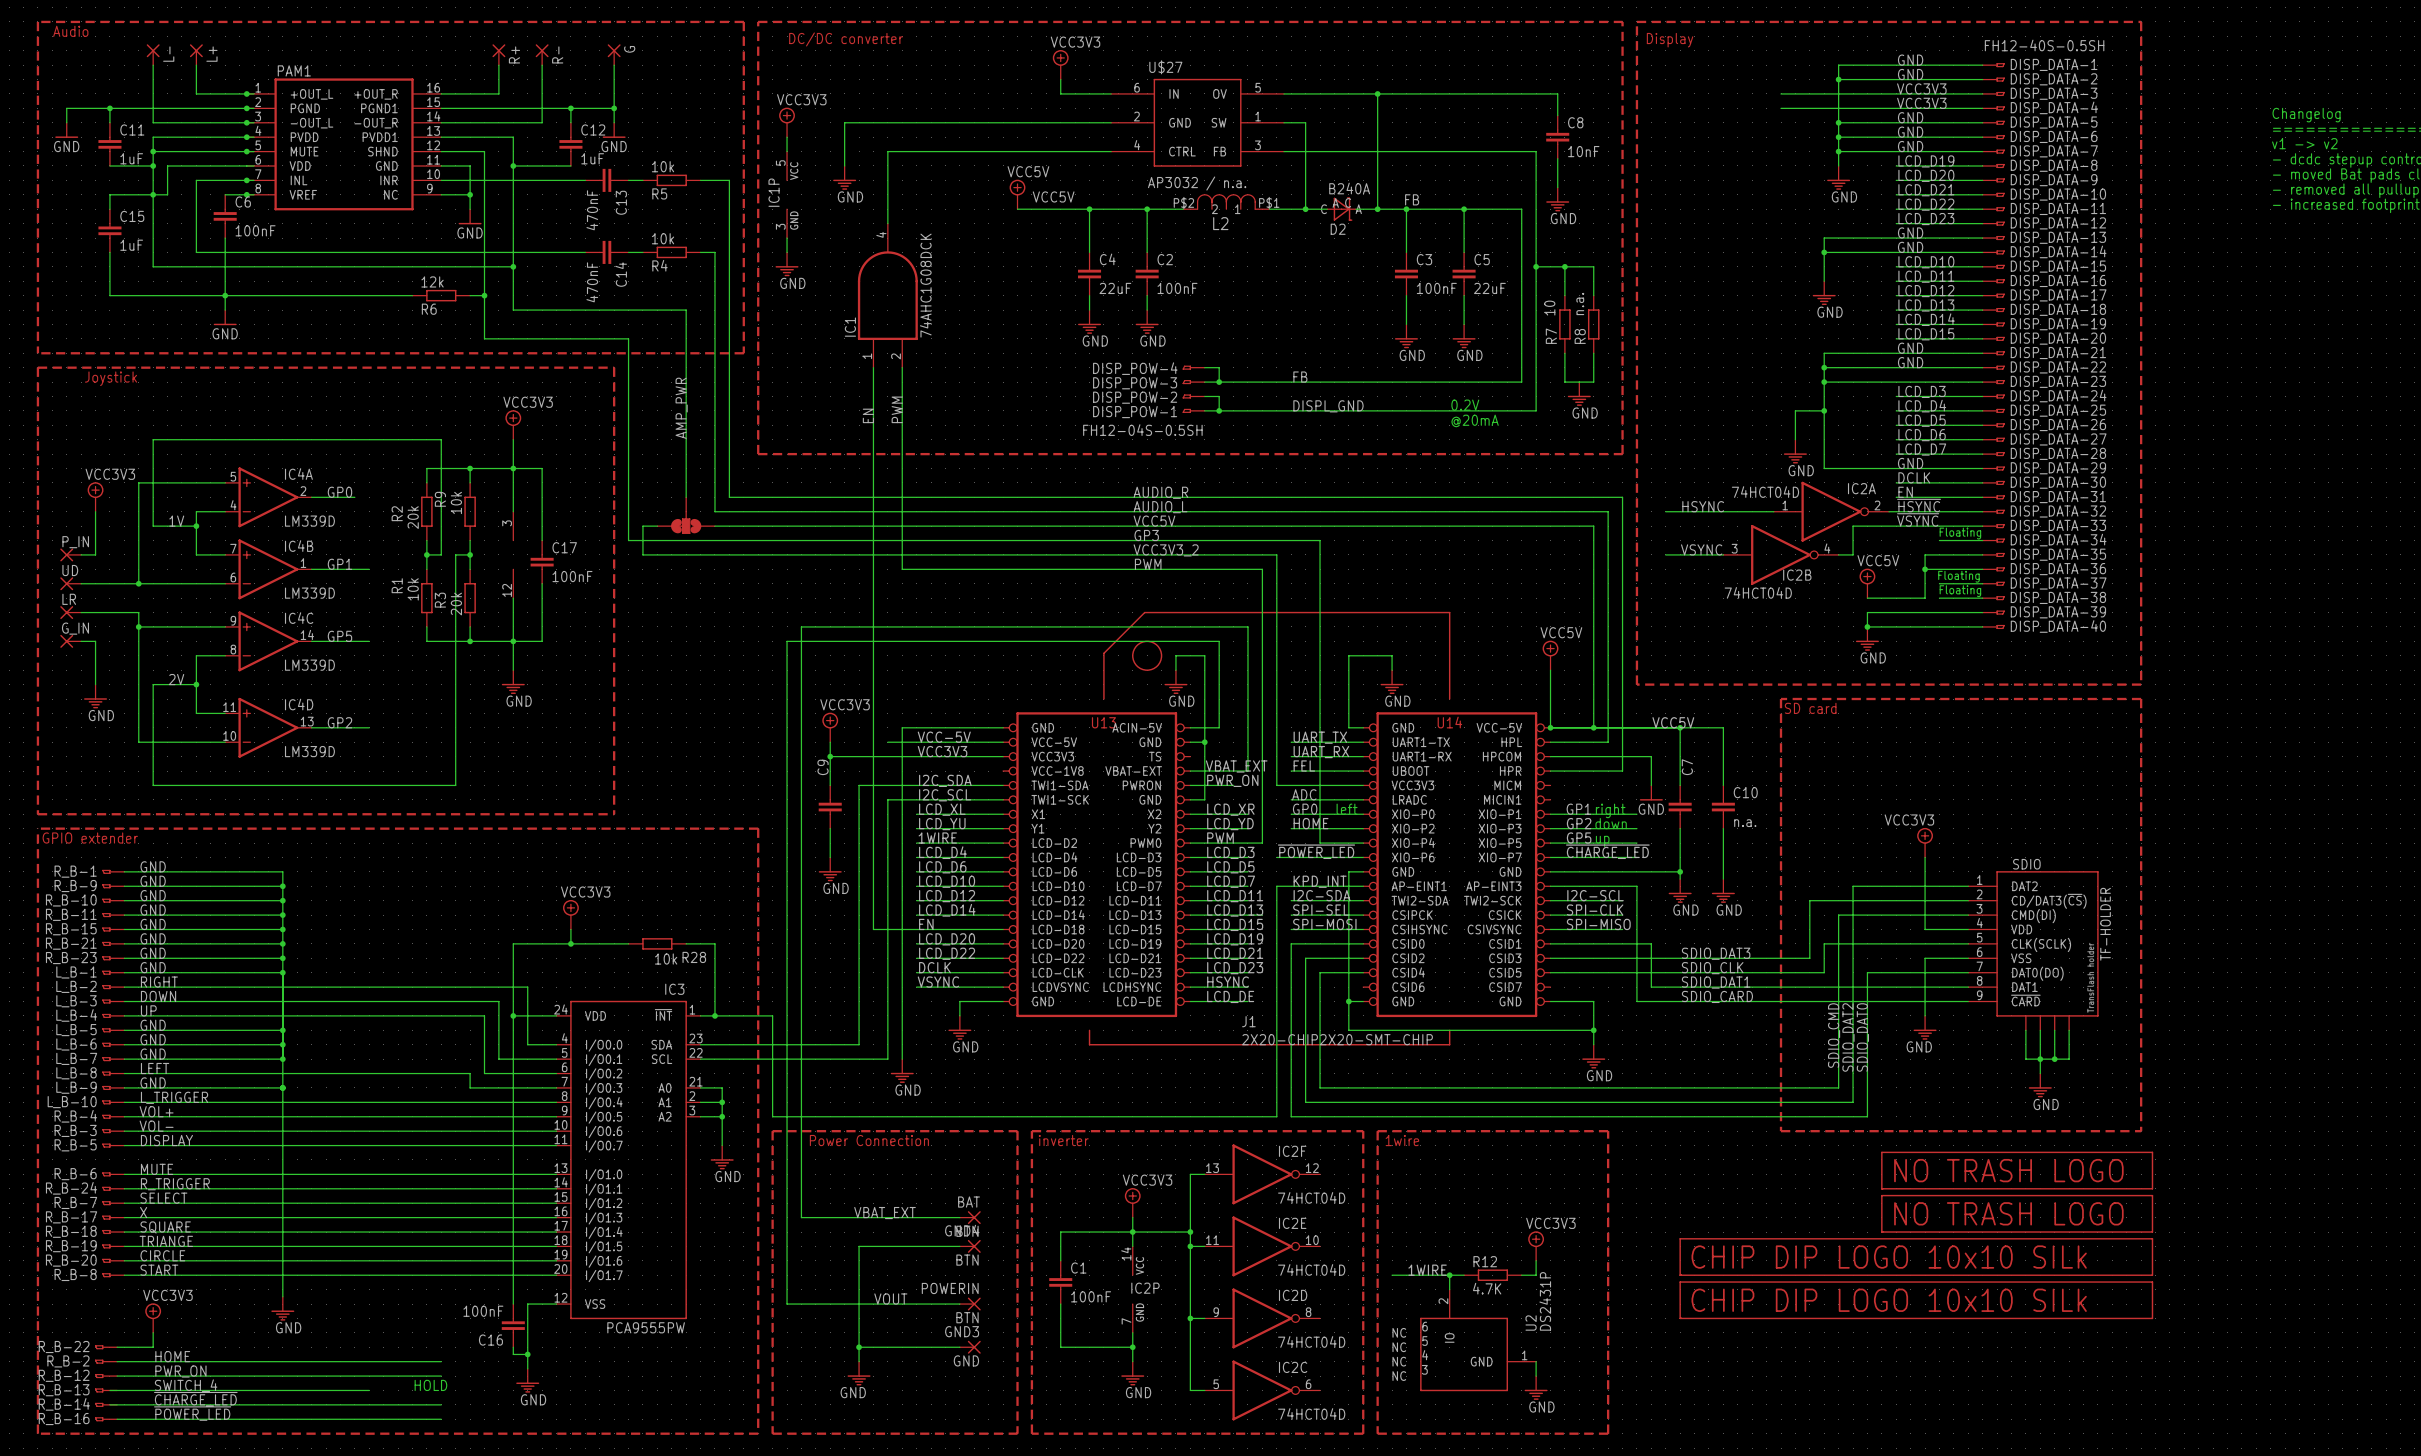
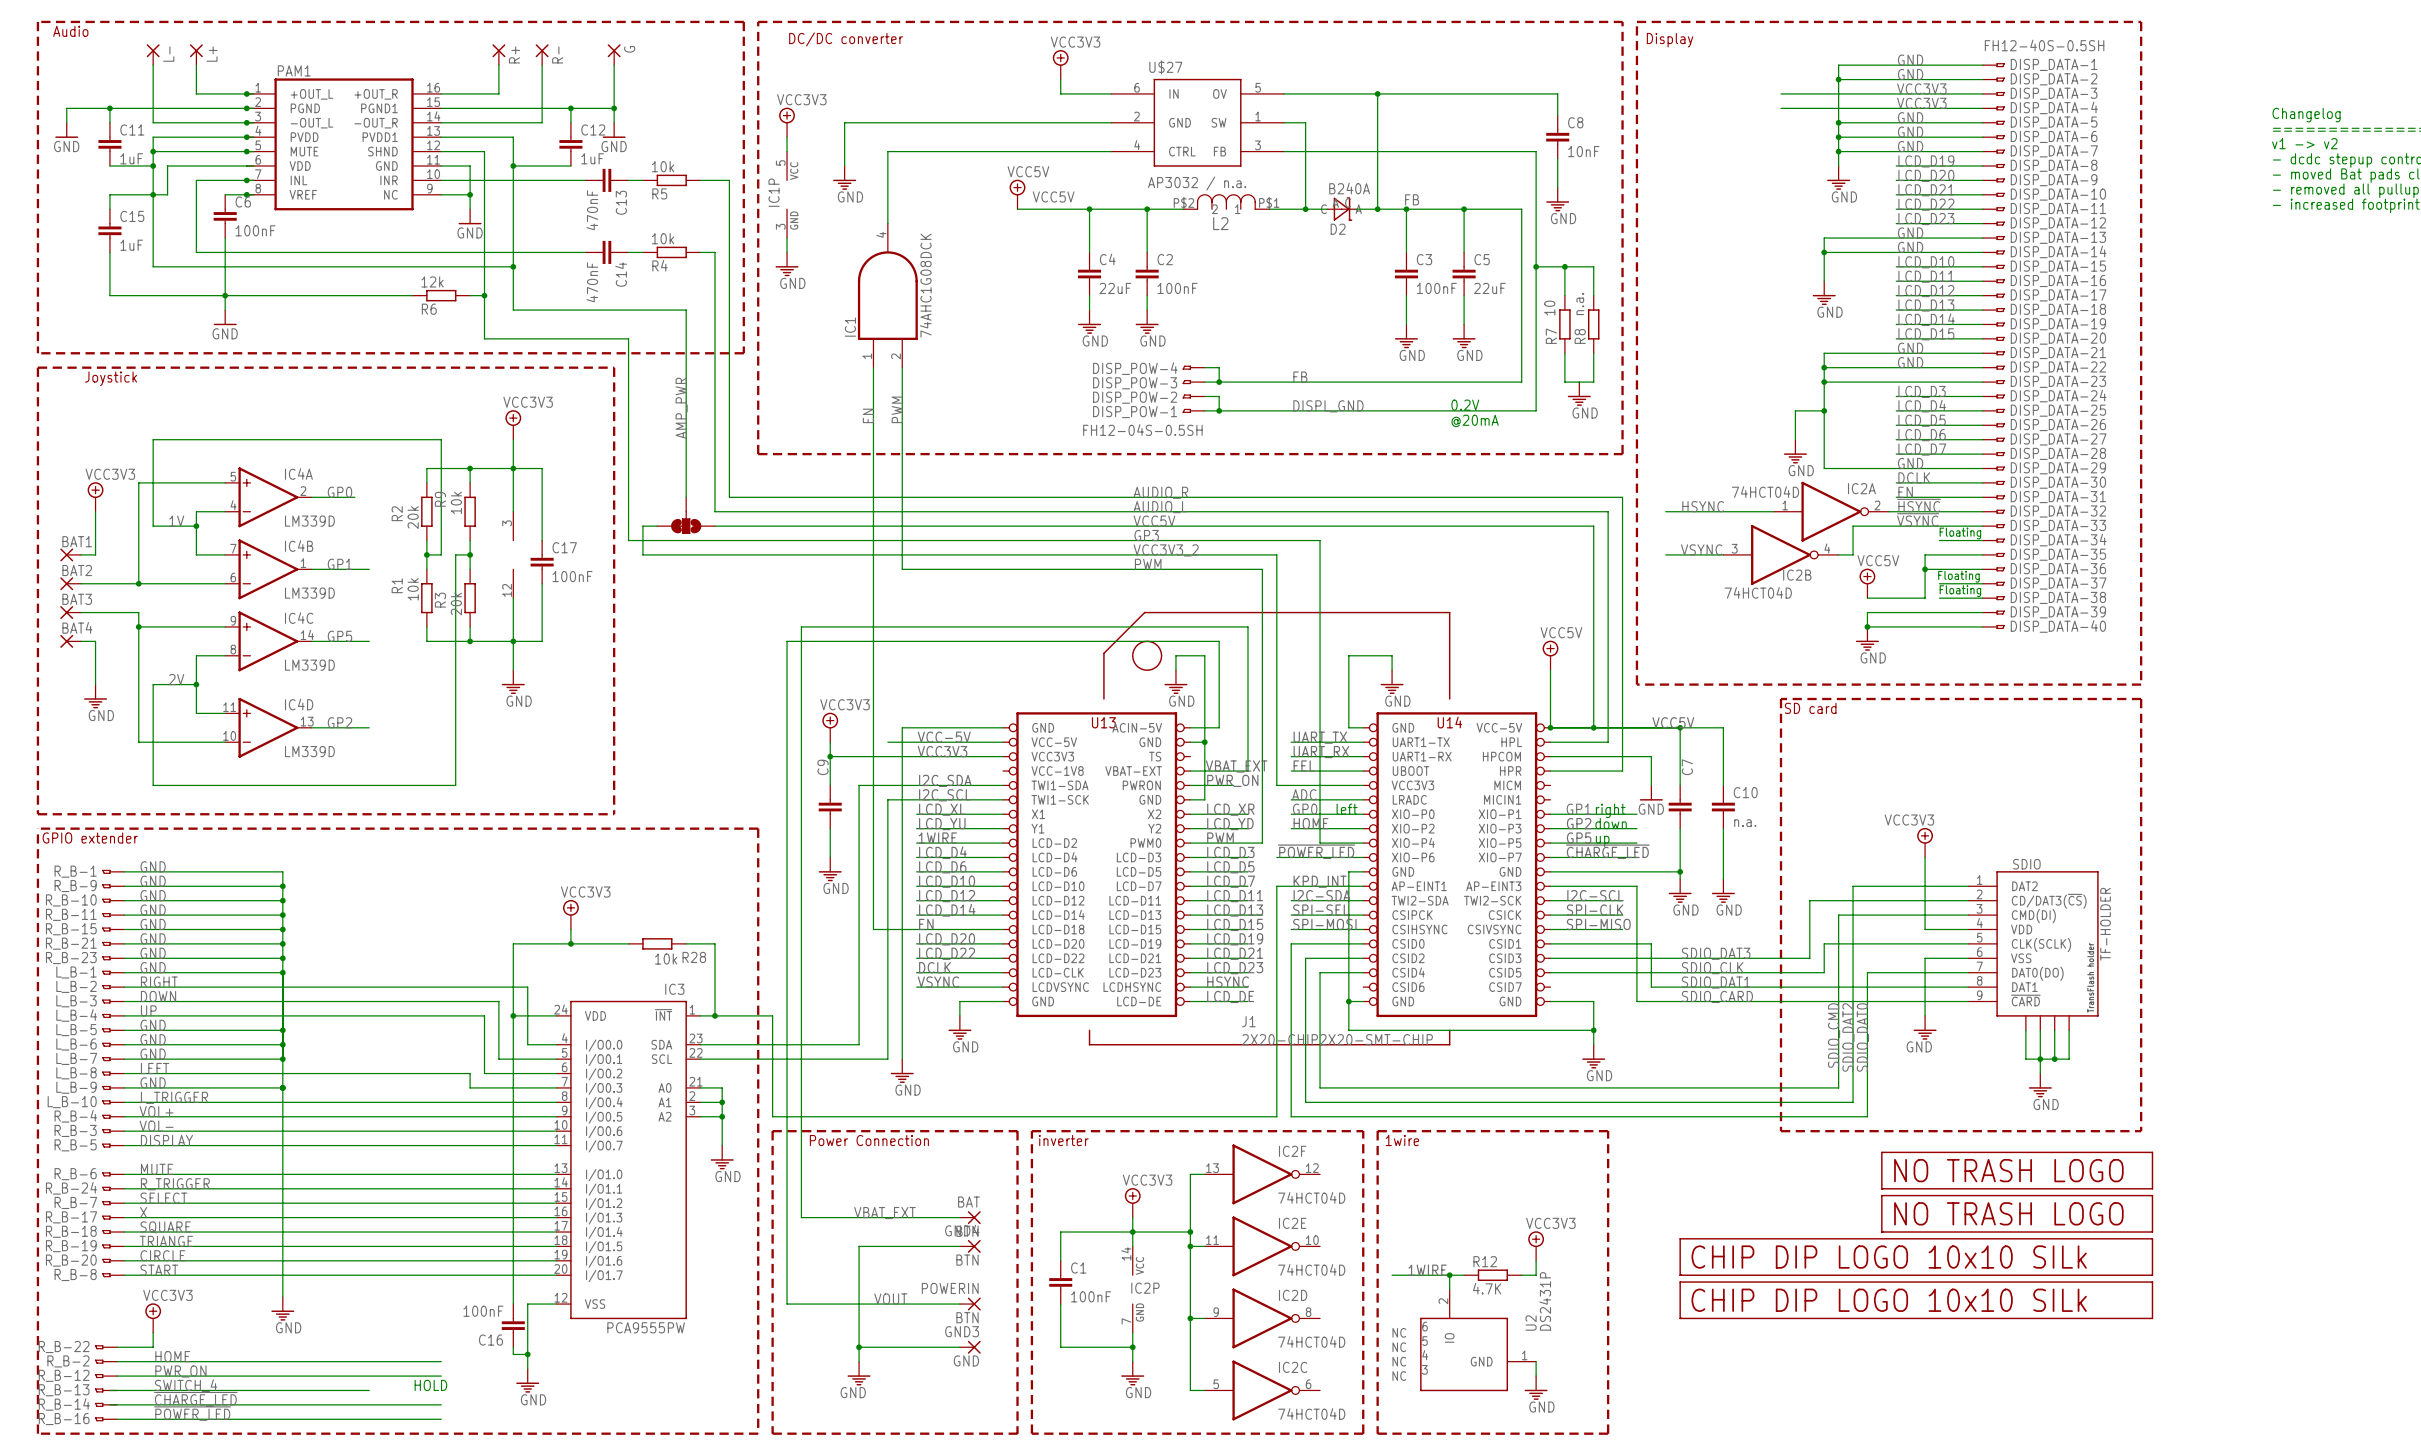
P_IN name: P_IN (75, 542) -> BAT1 (77, 541)
UD name: UD (70, 570) -> BAT2 (77, 570)
LR name: LR (69, 599) -> BAT3 (77, 599)
G_IN name: G_IN (75, 628) -> BAT4 (77, 627)

